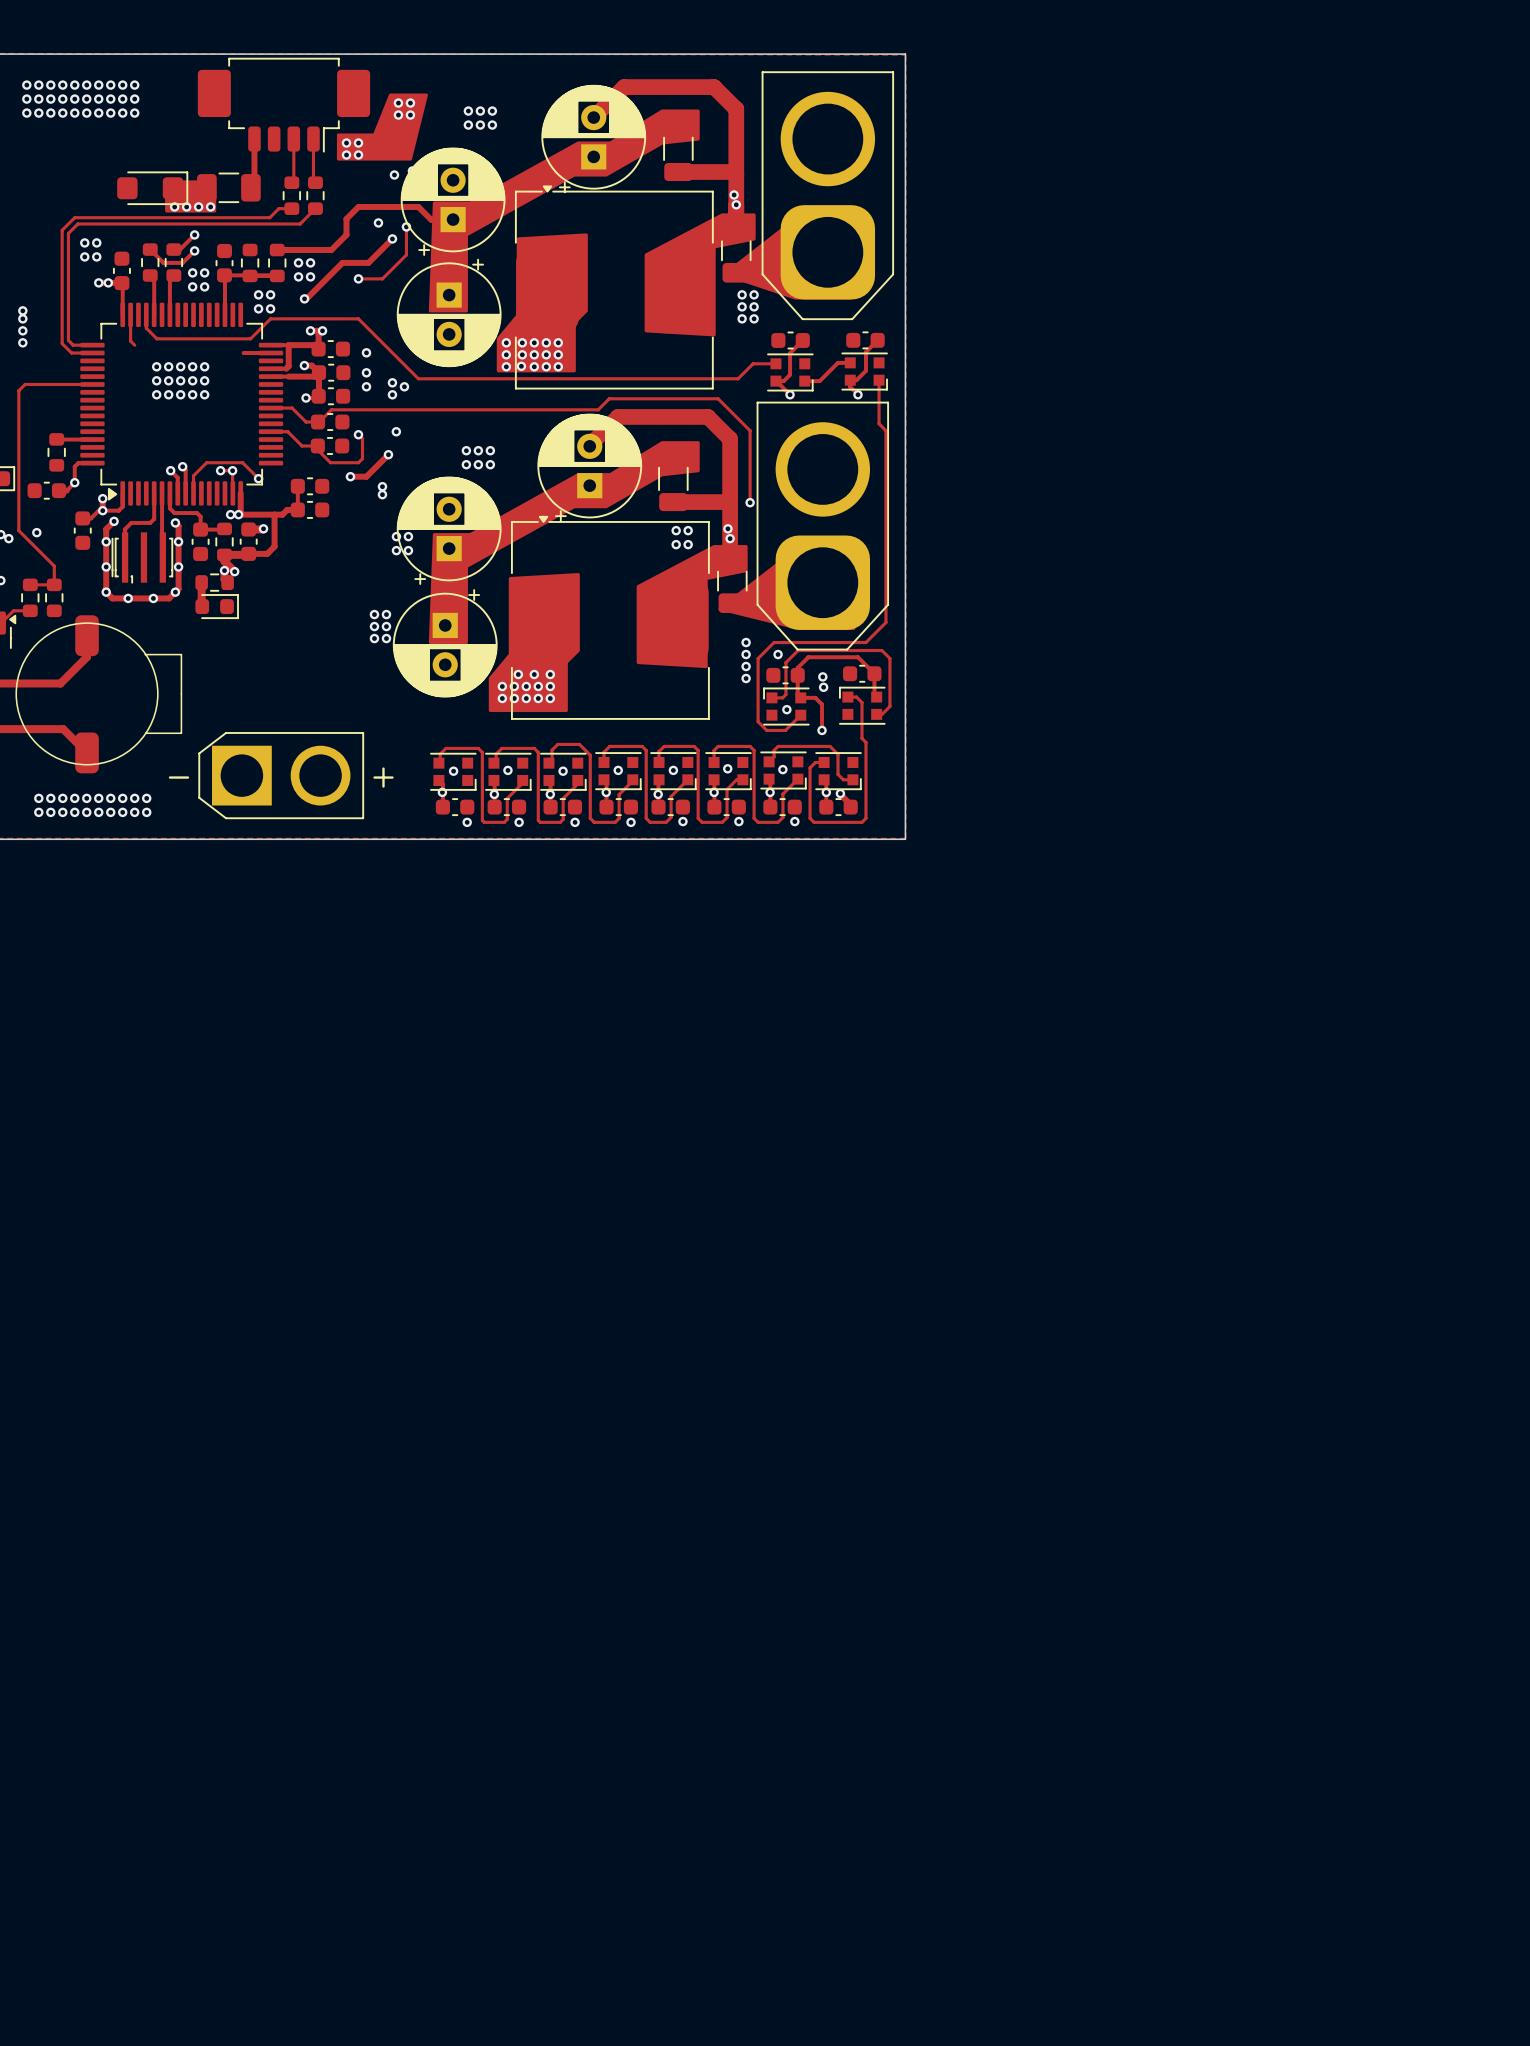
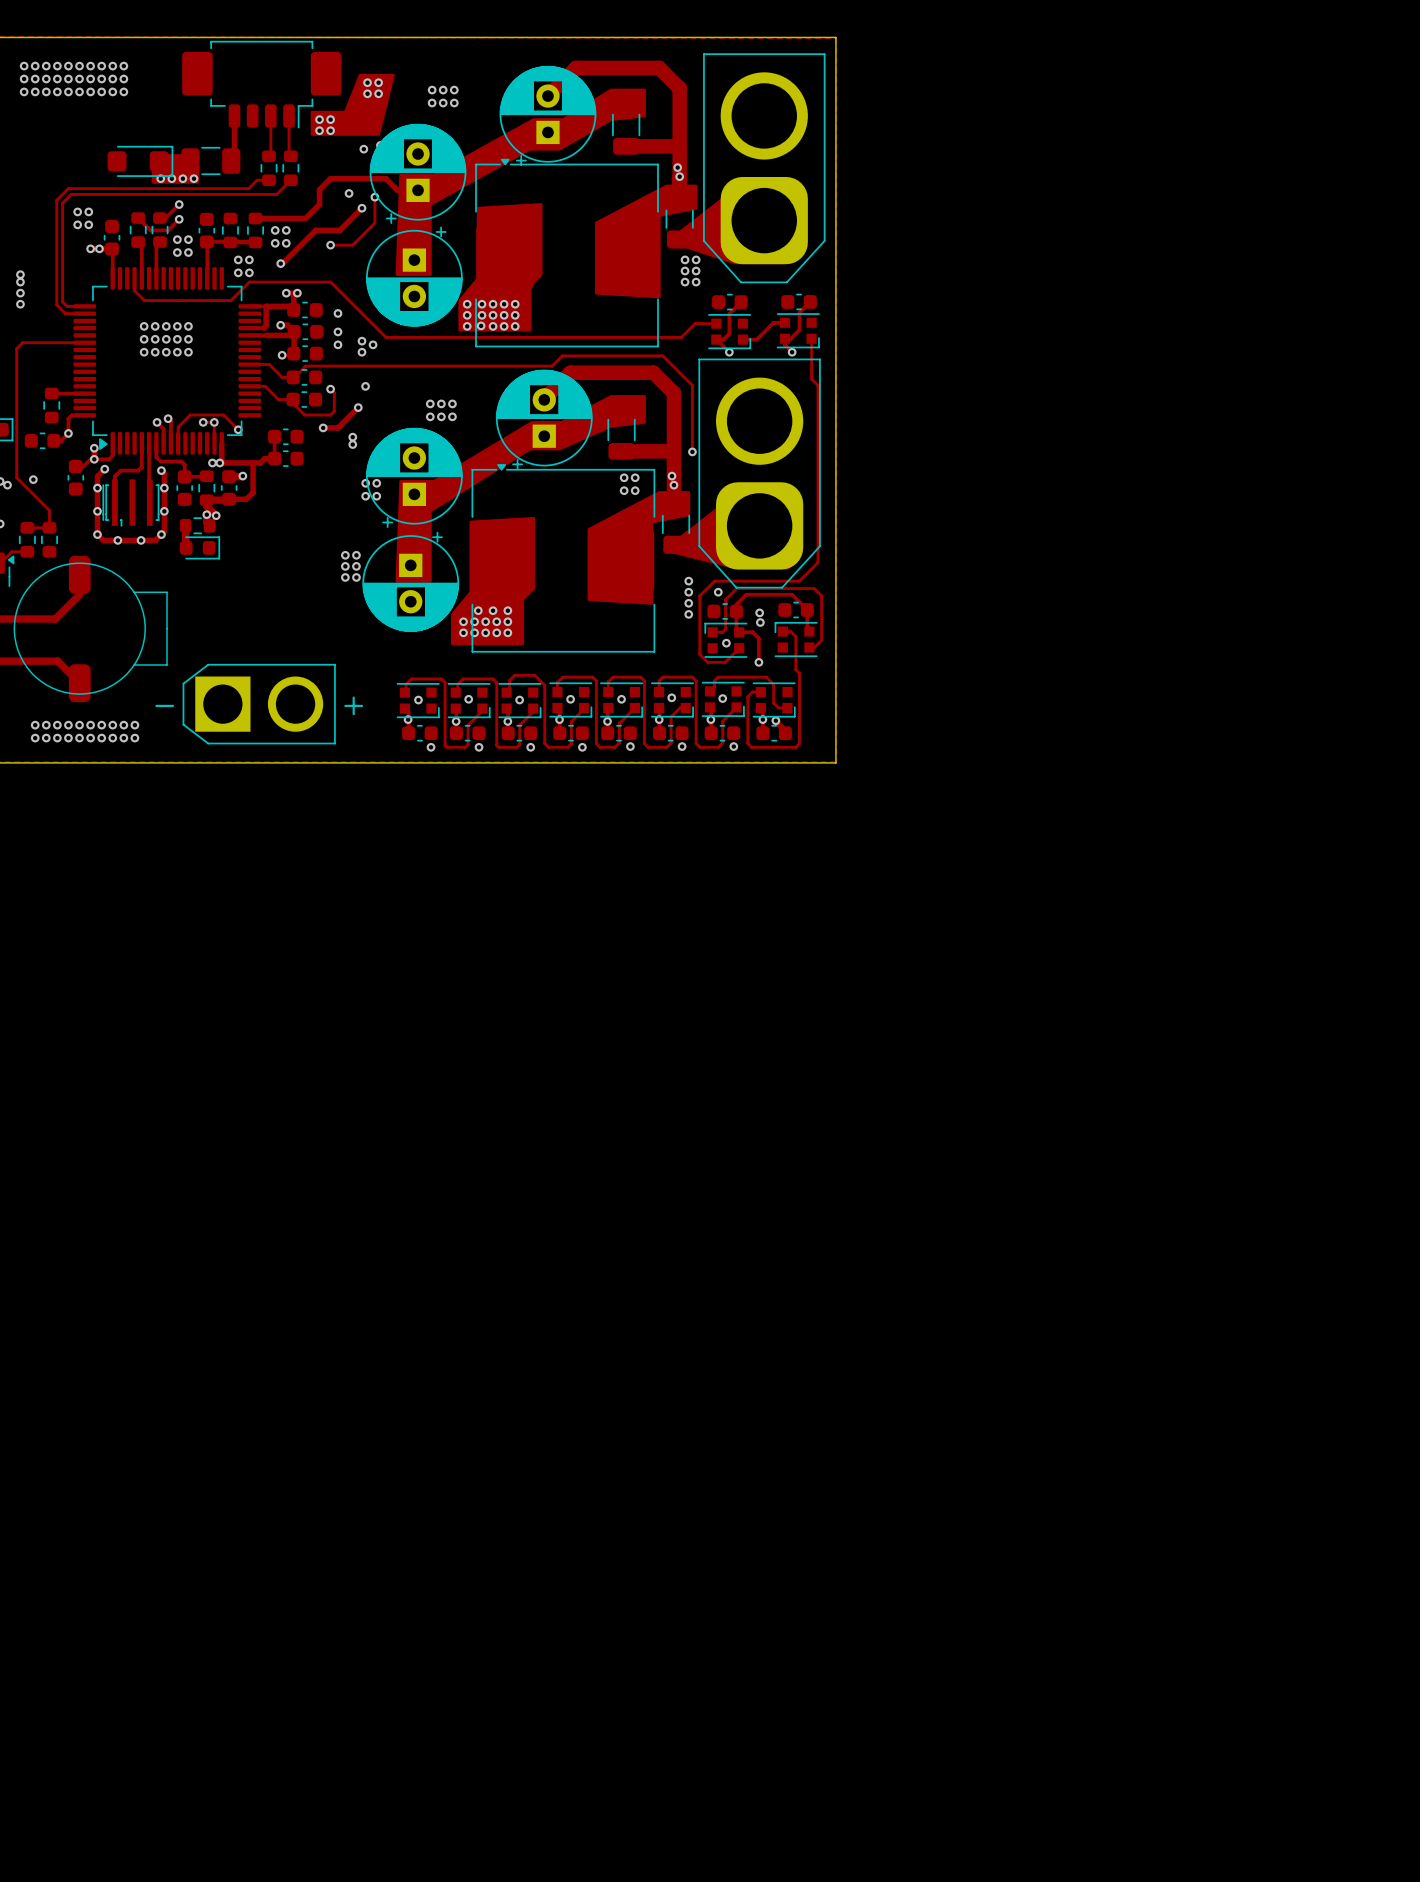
track: (130, 314) (130, 341) (134, 345) -> none
track: (243, 353) (271, 353) -> none
drawing shape: [428, 441, 700, 645] -> [395, 395, 646, 583]

